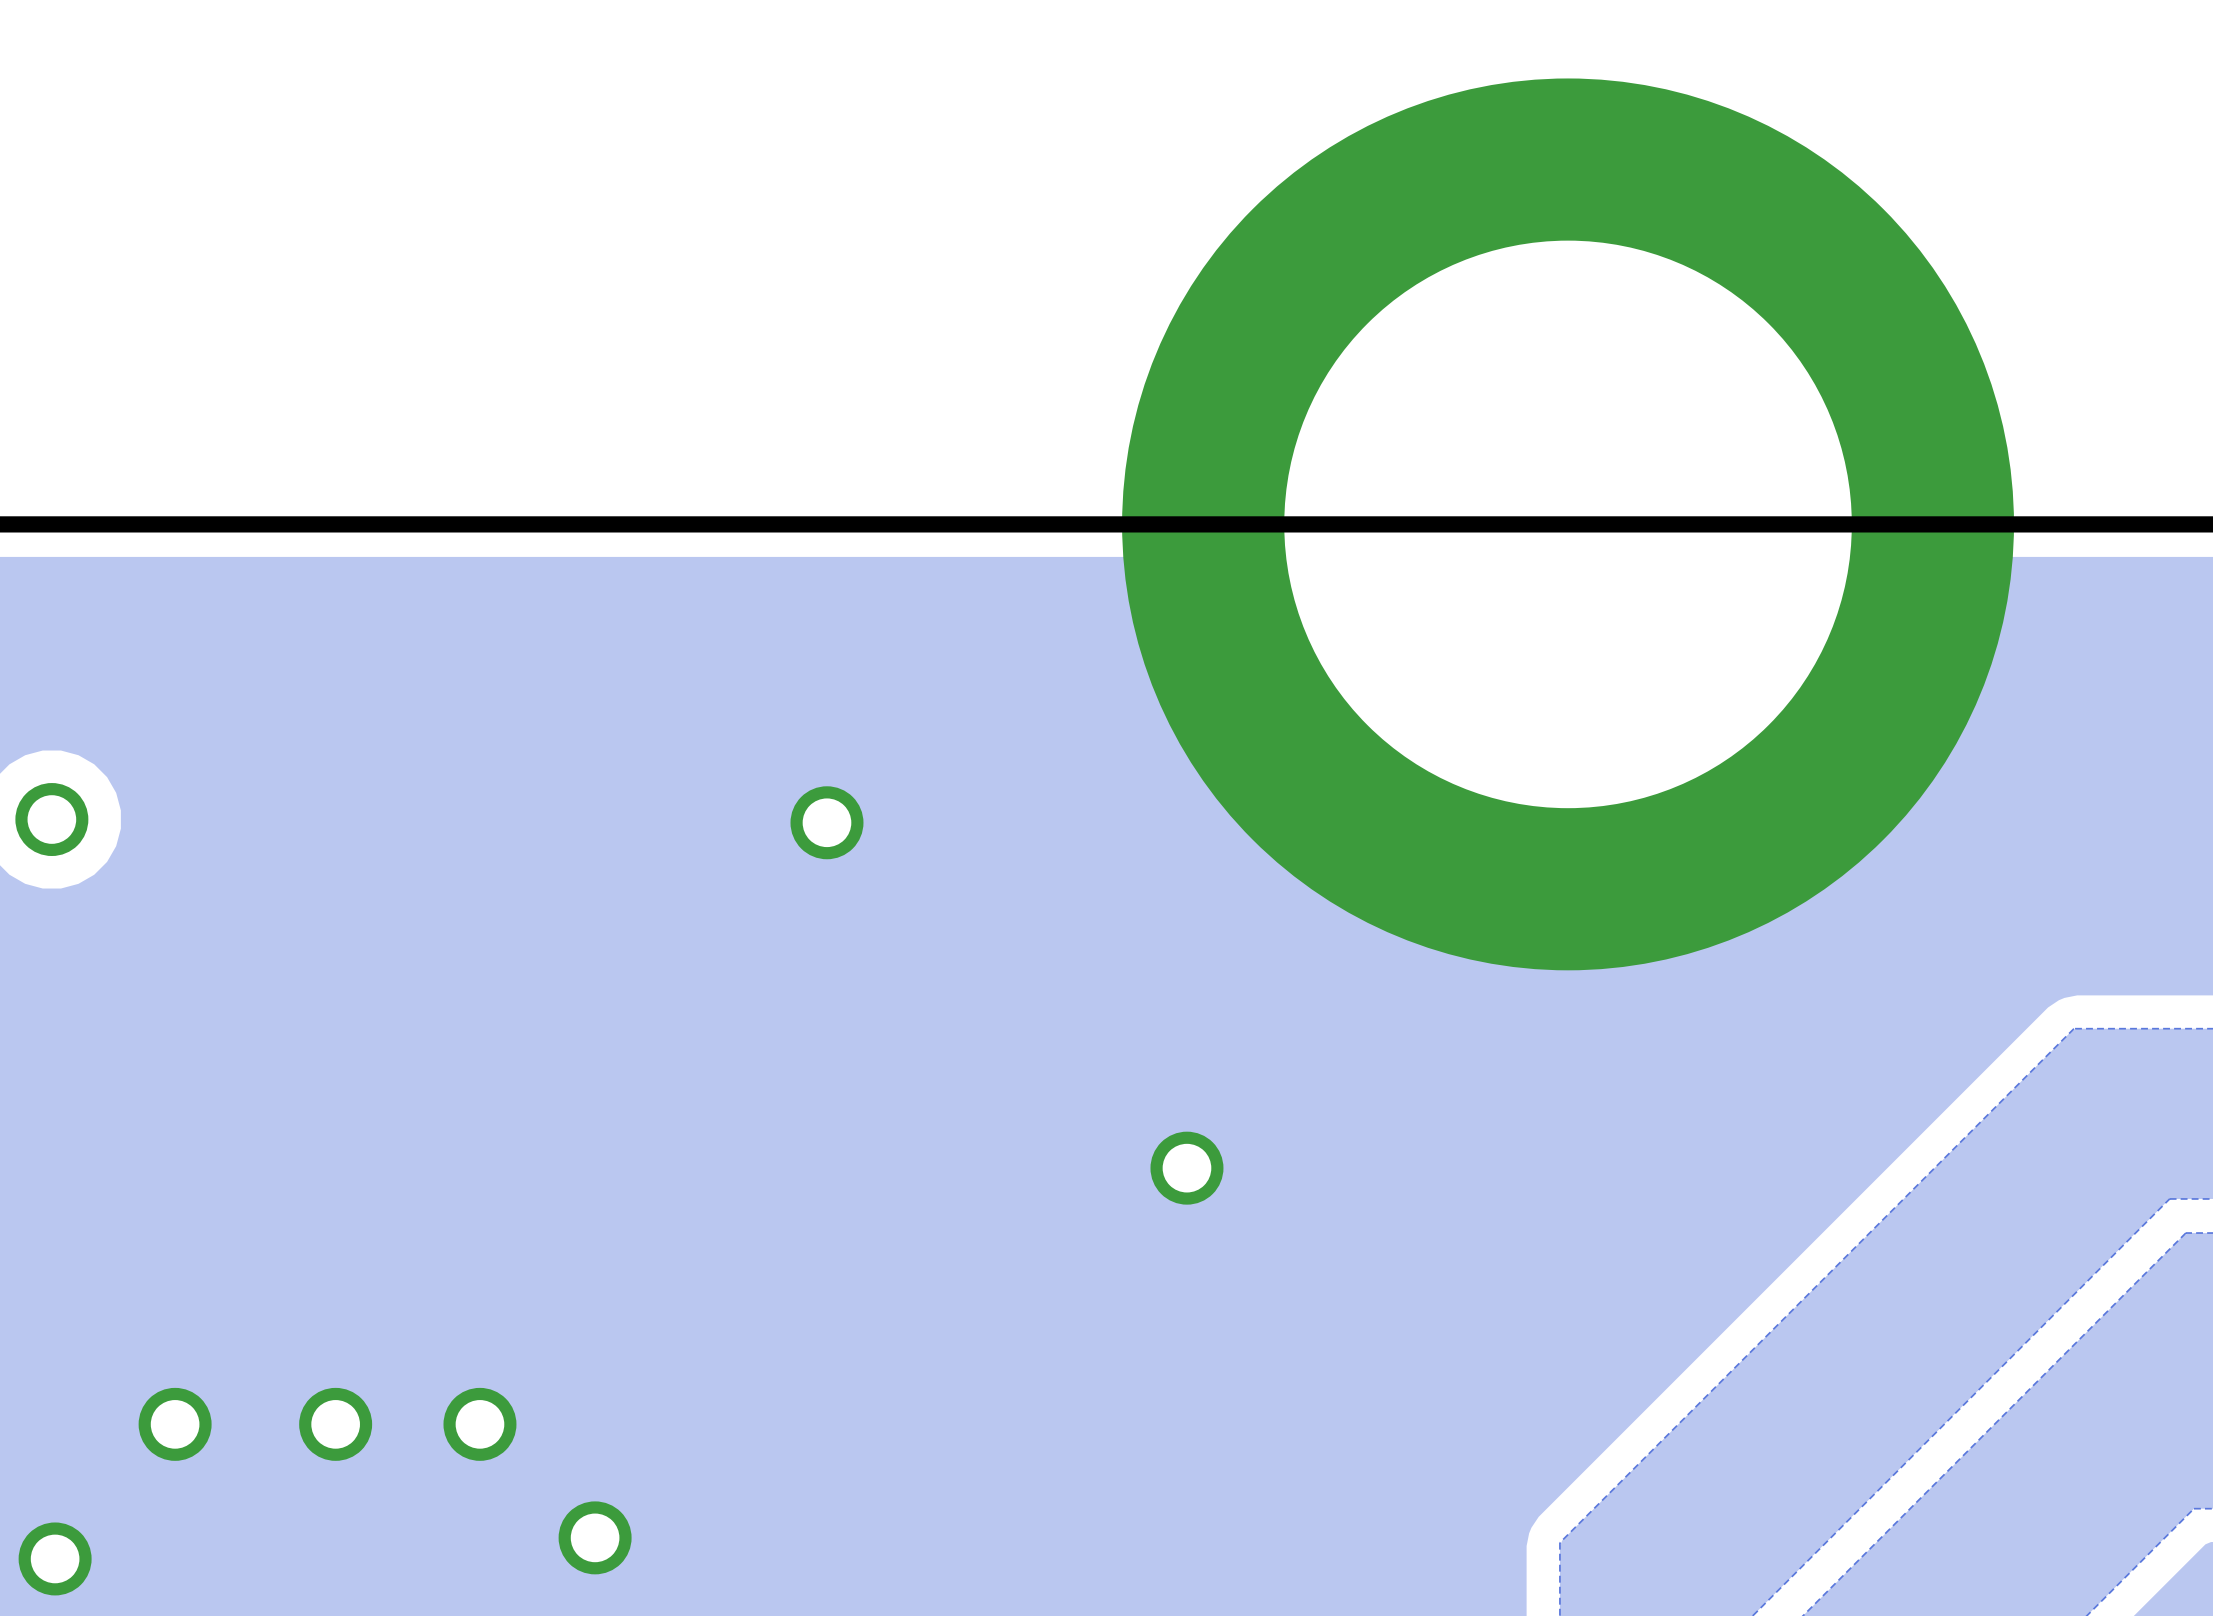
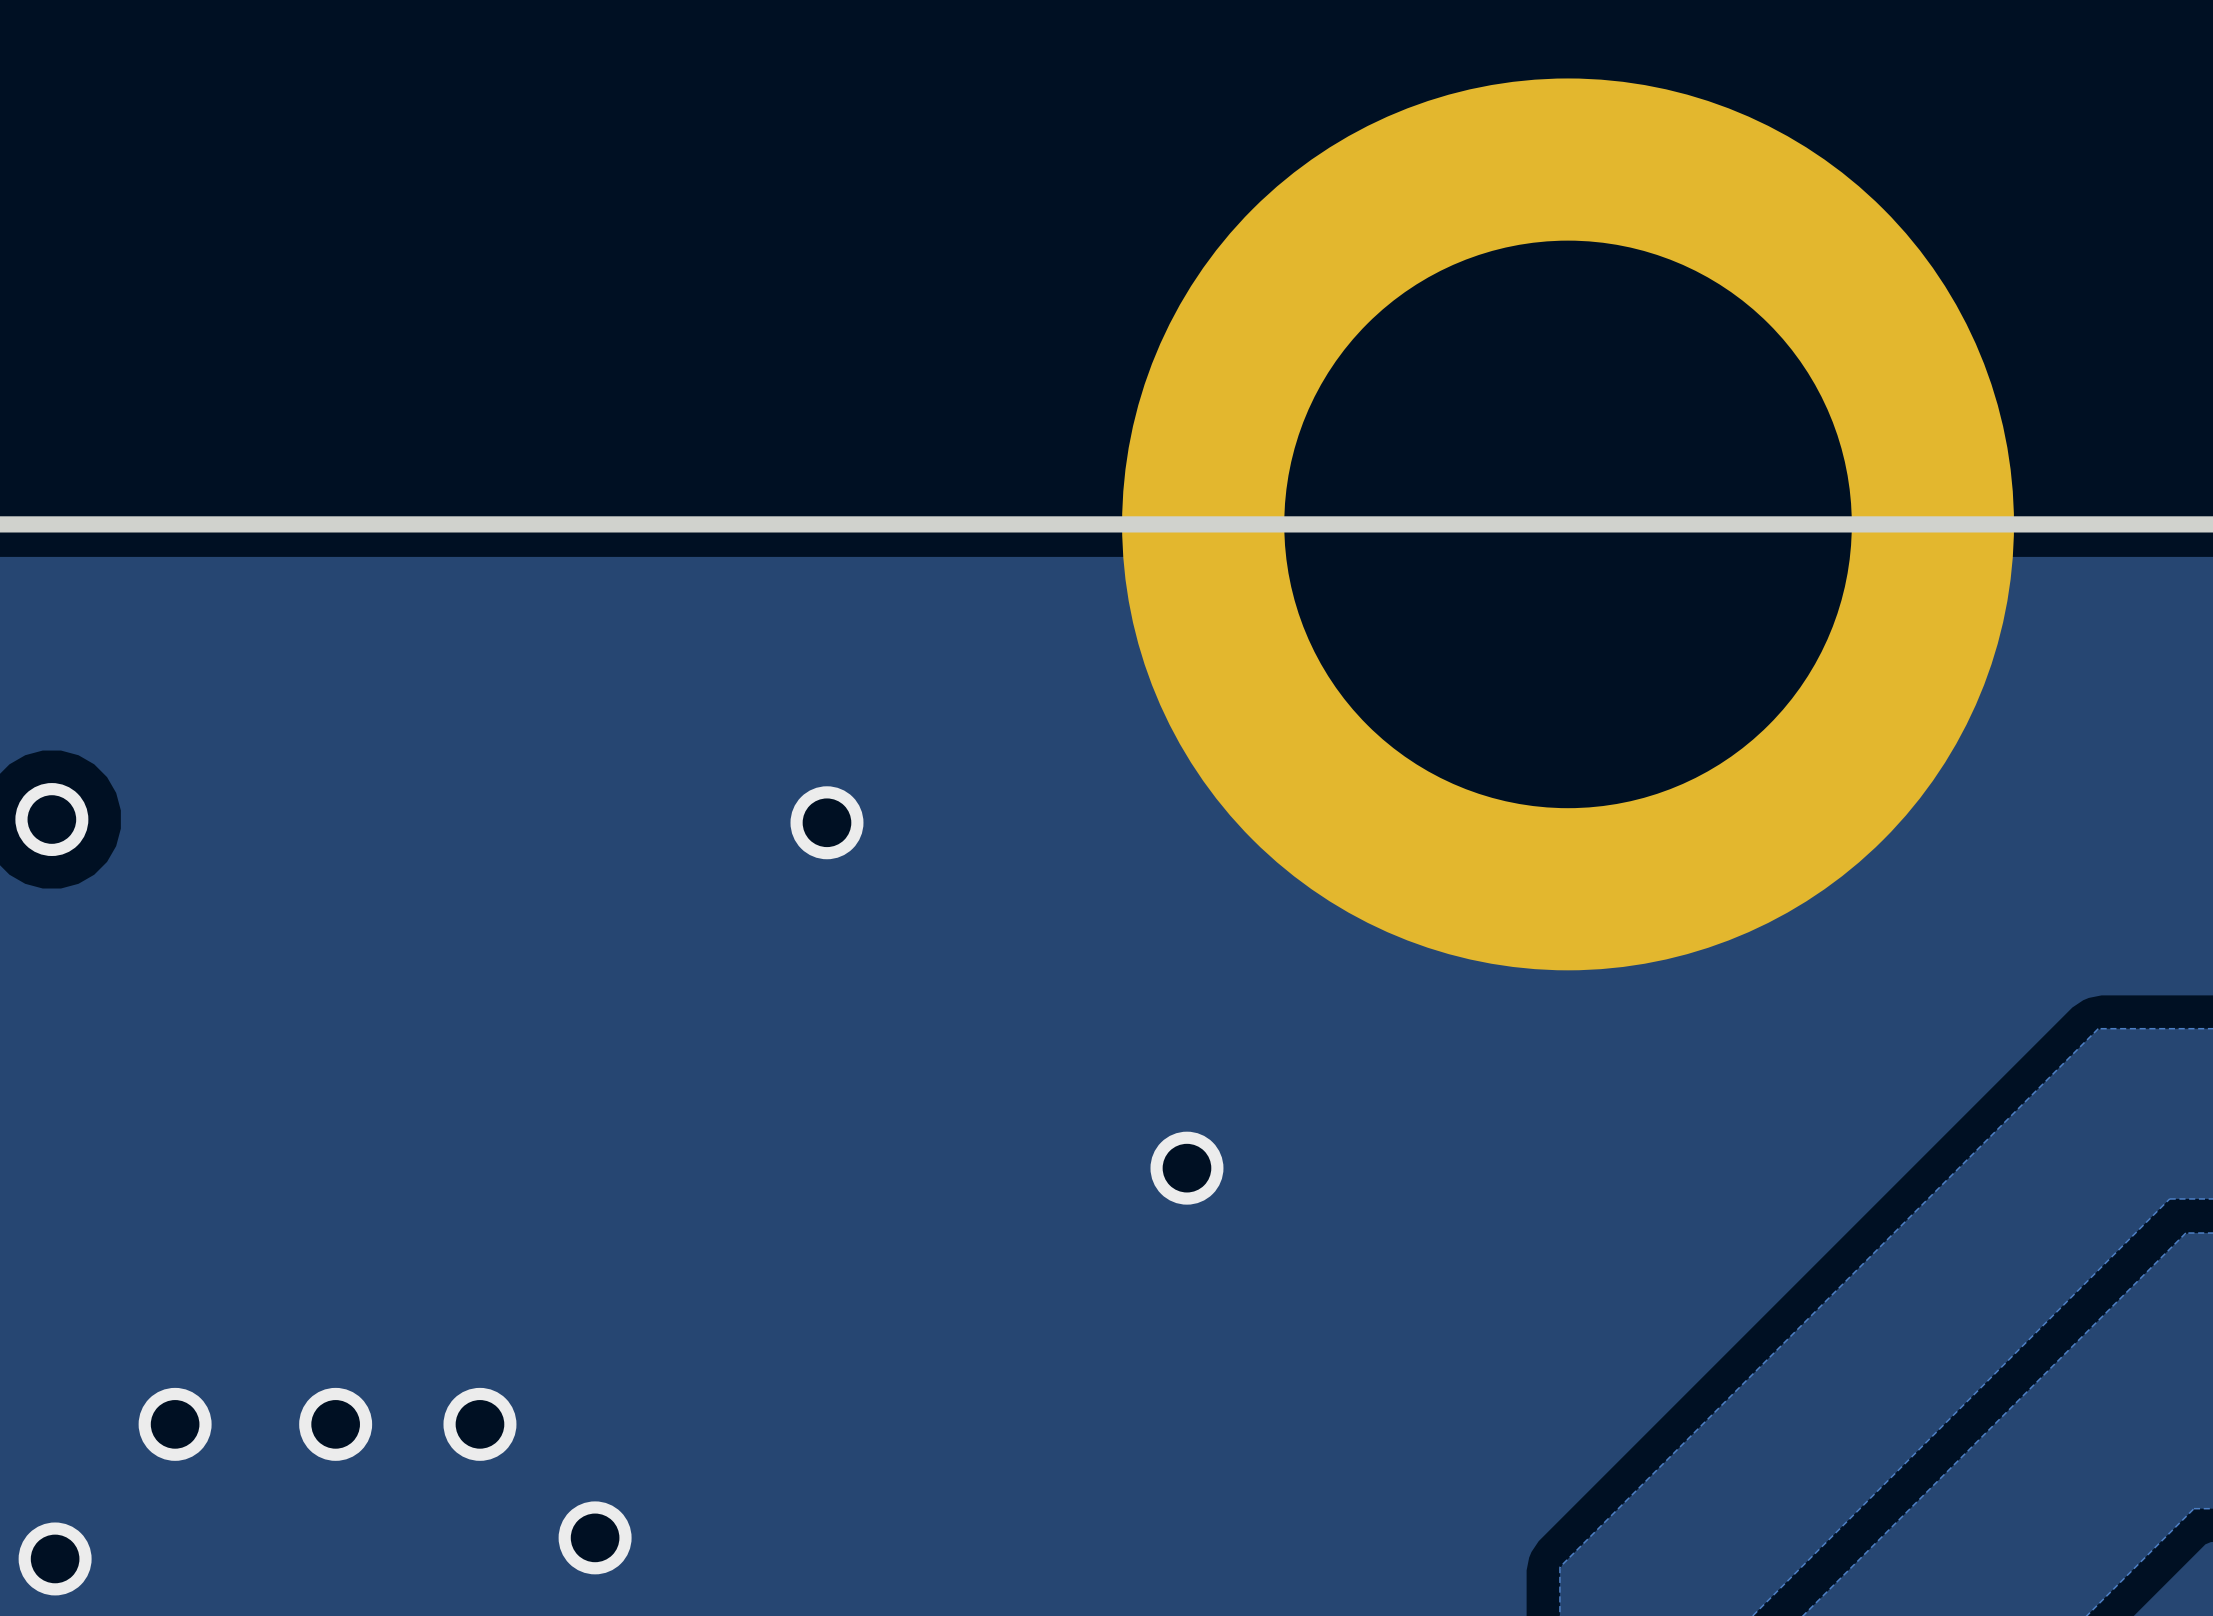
zone outline: (2098, 1028) (2073, 1028) (1559, 1542) (1559, 1567) -> (2098, 1028) (1559, 1567)

